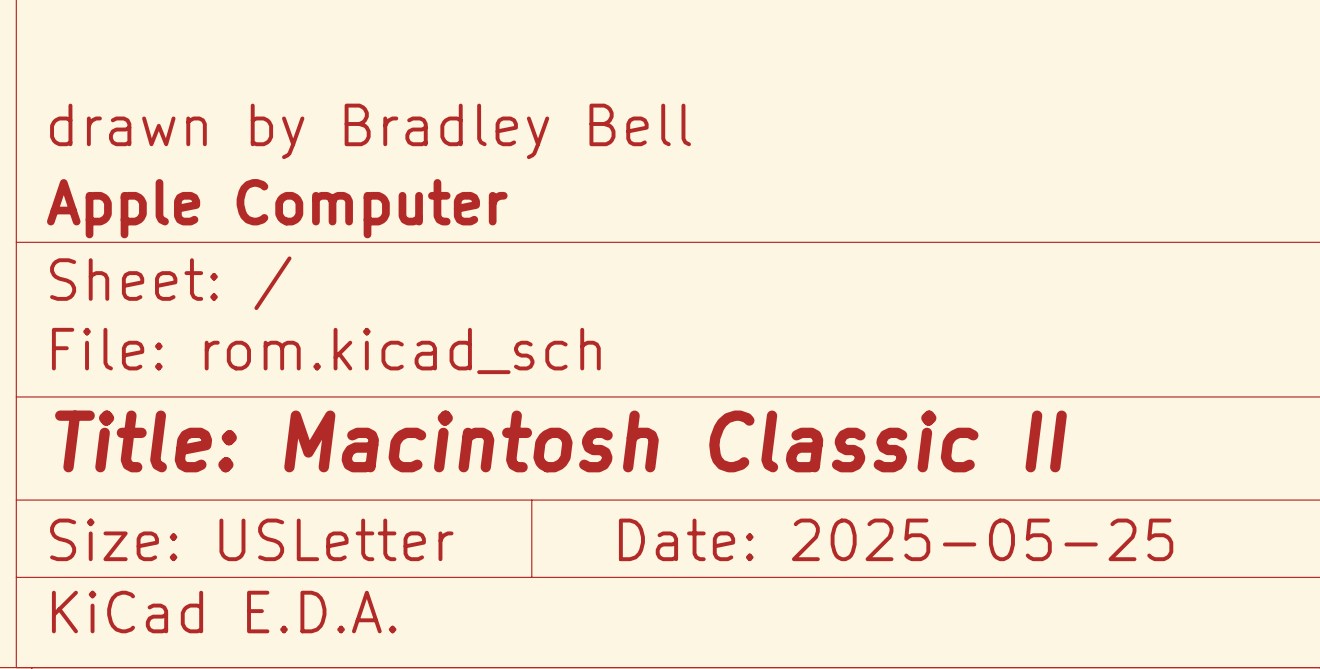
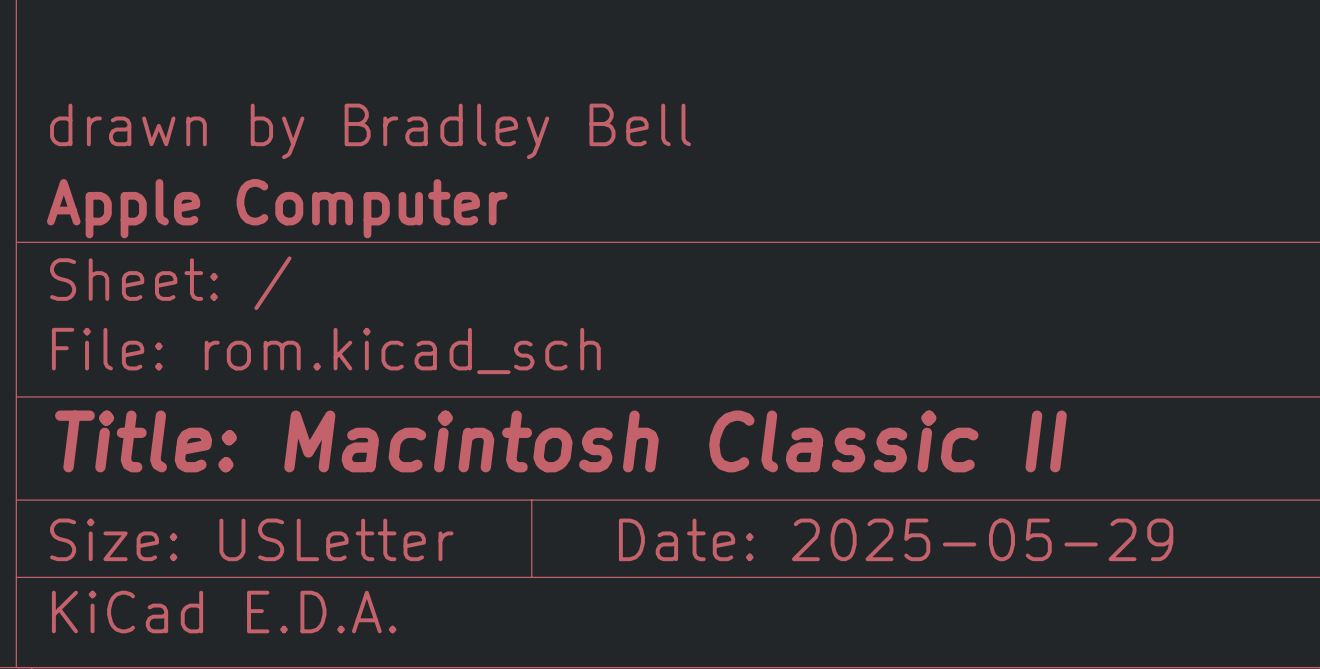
title block: Date: 2025-05-25 (896, 539) -> Date: 2025-05-29 (896, 539)

